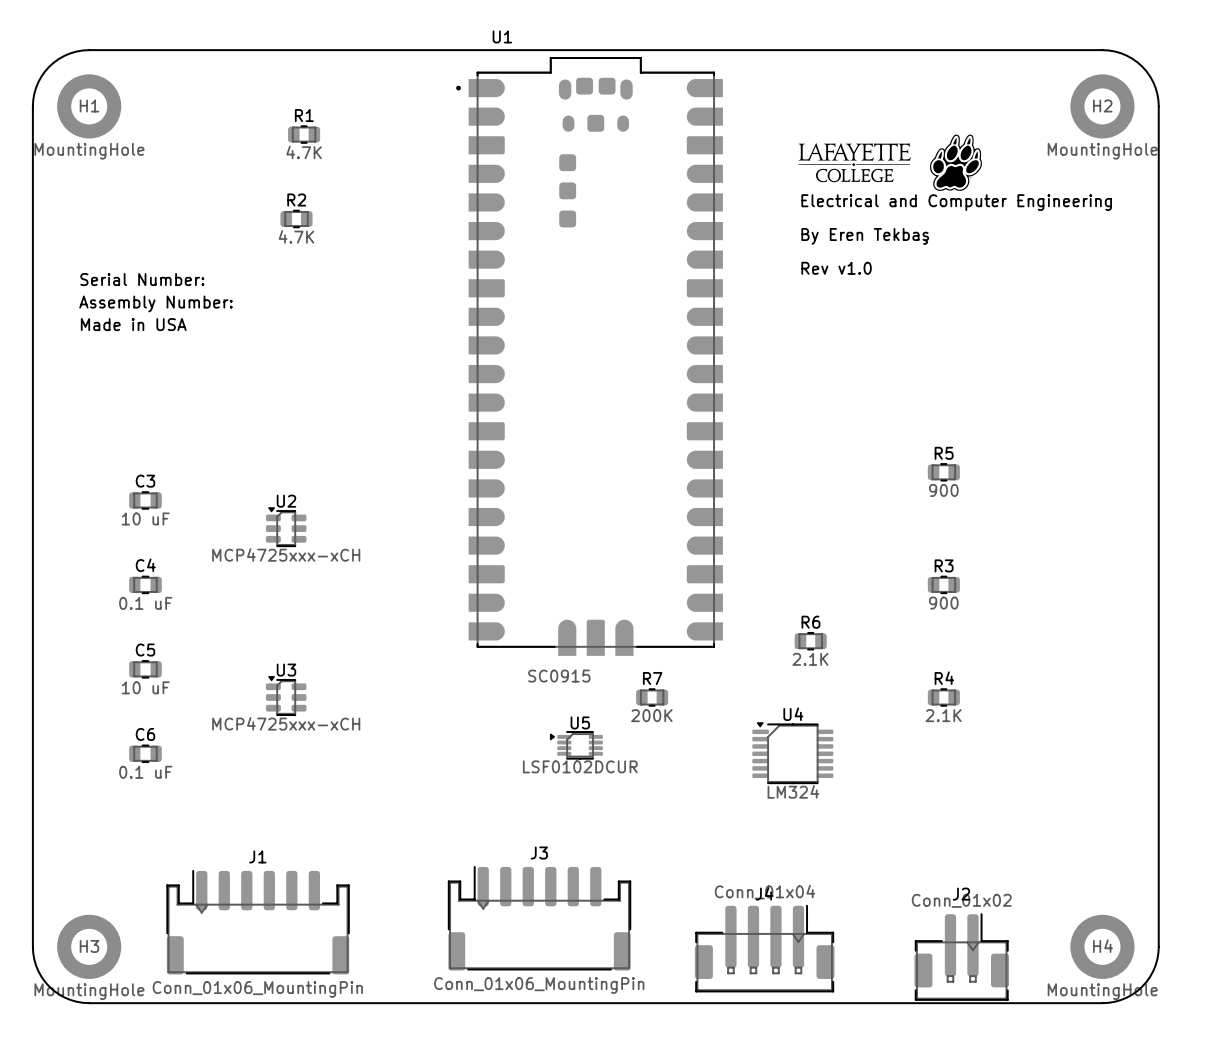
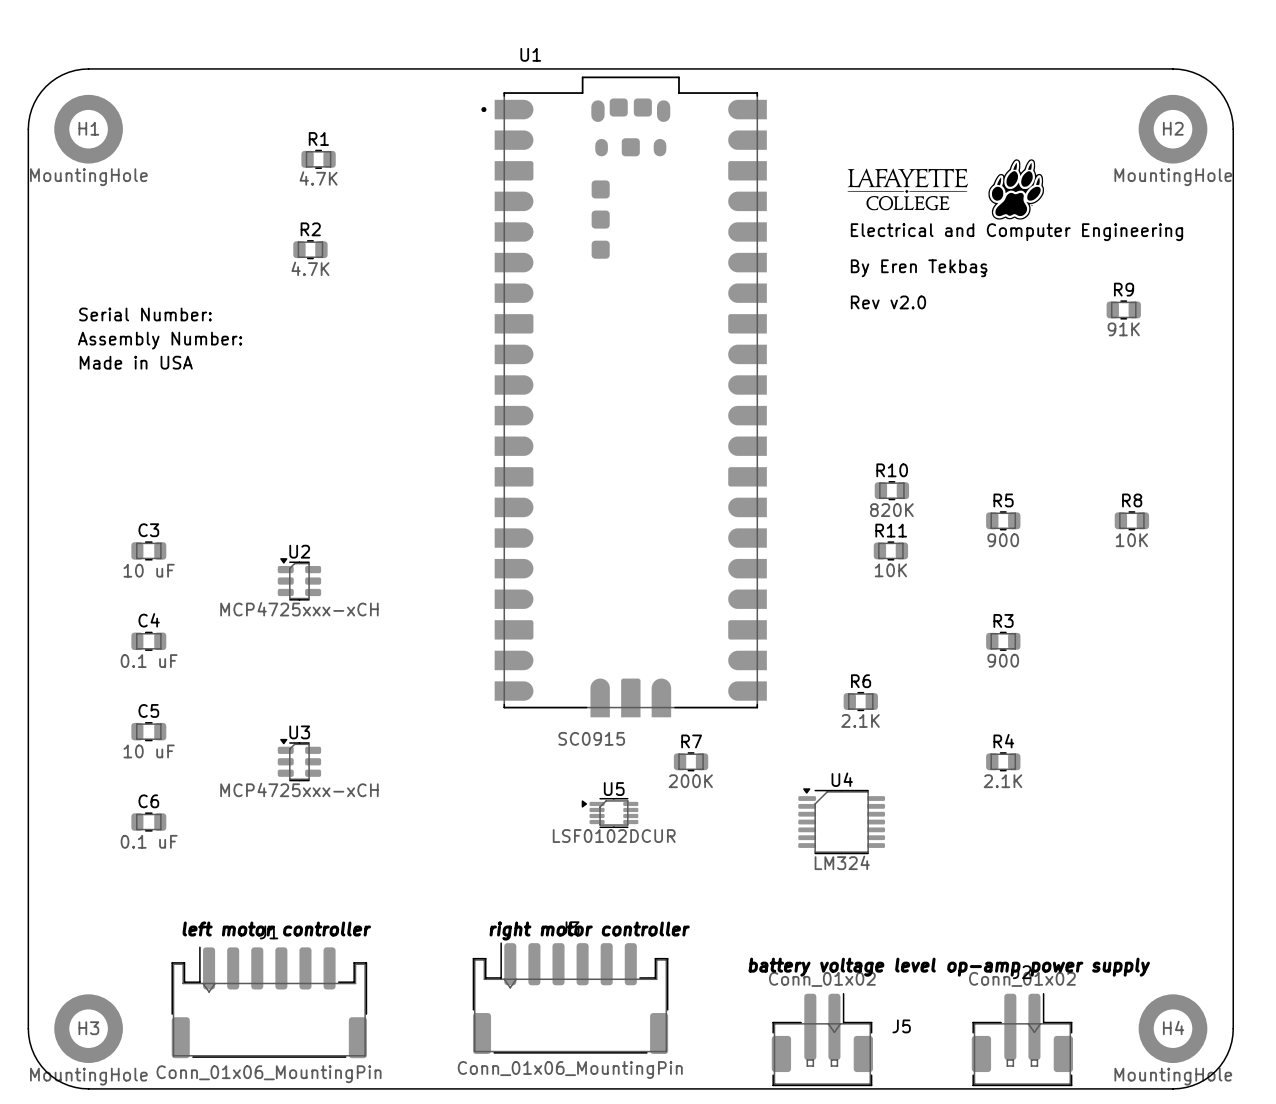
text: Rev v1.0 (836, 268) -> Rev v2.0 (888, 302)
R9: none -> 91K (1123, 309)
R10: none -> 820K (891, 490)
R8: none -> 10K (1131, 520)
R11: none -> 10K (890, 550)
text: none -> left motor controller (276, 929)
text: none -> right motor controller (589, 931)
text: none -> battery voltage level (842, 967)
text: none -> op-amp power supply (1048, 967)
J4: Conn_01x04 (764, 948) -> none
J5: none -> Conn_01x02 (822, 1039)

